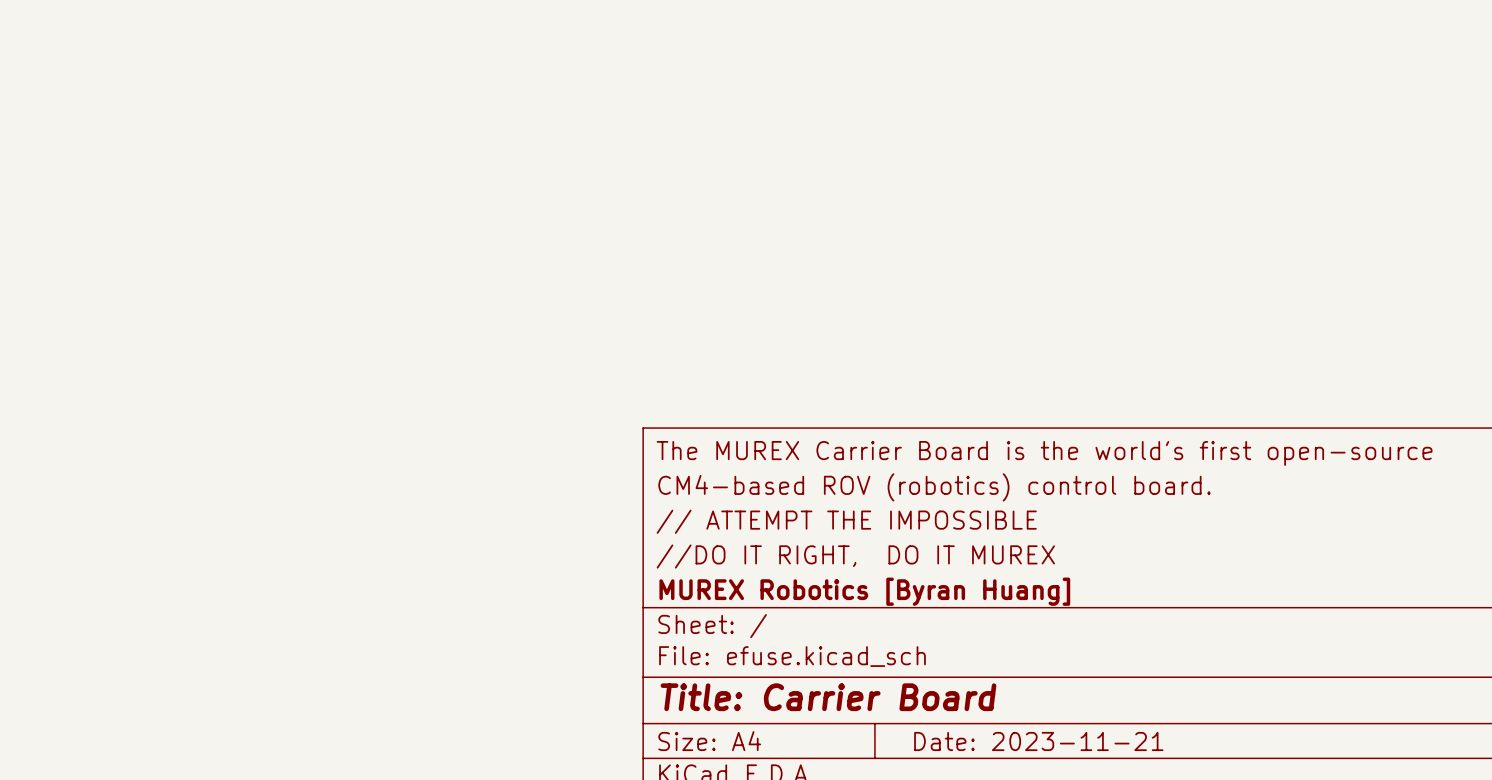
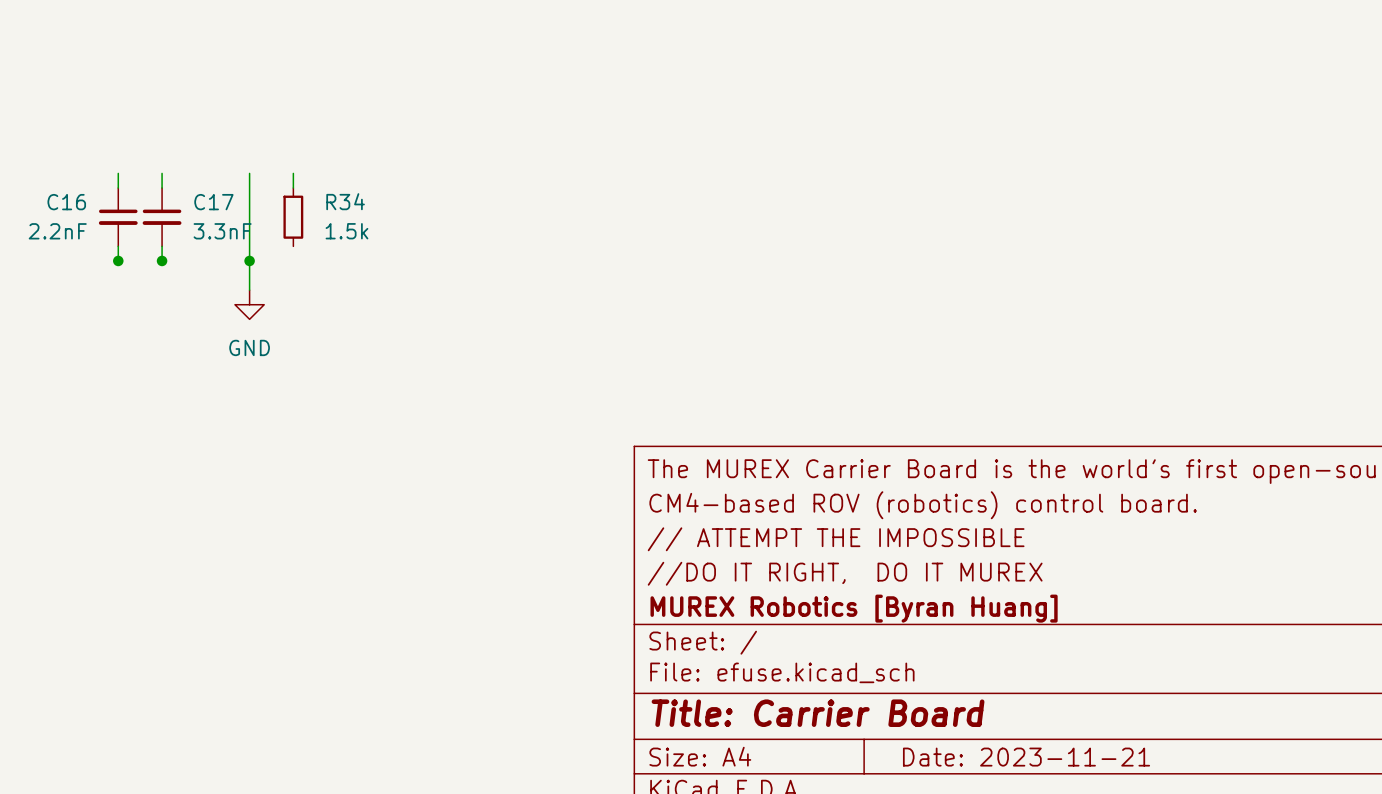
wire: none -> (118, 173) (118, 188)
wire: none -> (162, 173) (162, 188)
wire: none -> (249, 173) (249, 290)
wire: none -> (293, 173) (293, 188)
C16: none -> 2.2nF (118, 217)
C17: none -> 3.3nF (162, 217)
R34: none -> 1.5k (293, 217)
wire: none -> (118, 246) (118, 260)
wire: none -> (162, 246) (162, 260)
junction: none -> (118, 260)
junction: none -> (162, 260)
junction: none -> (249, 260)
power symbol: none -> GND (249, 304)

